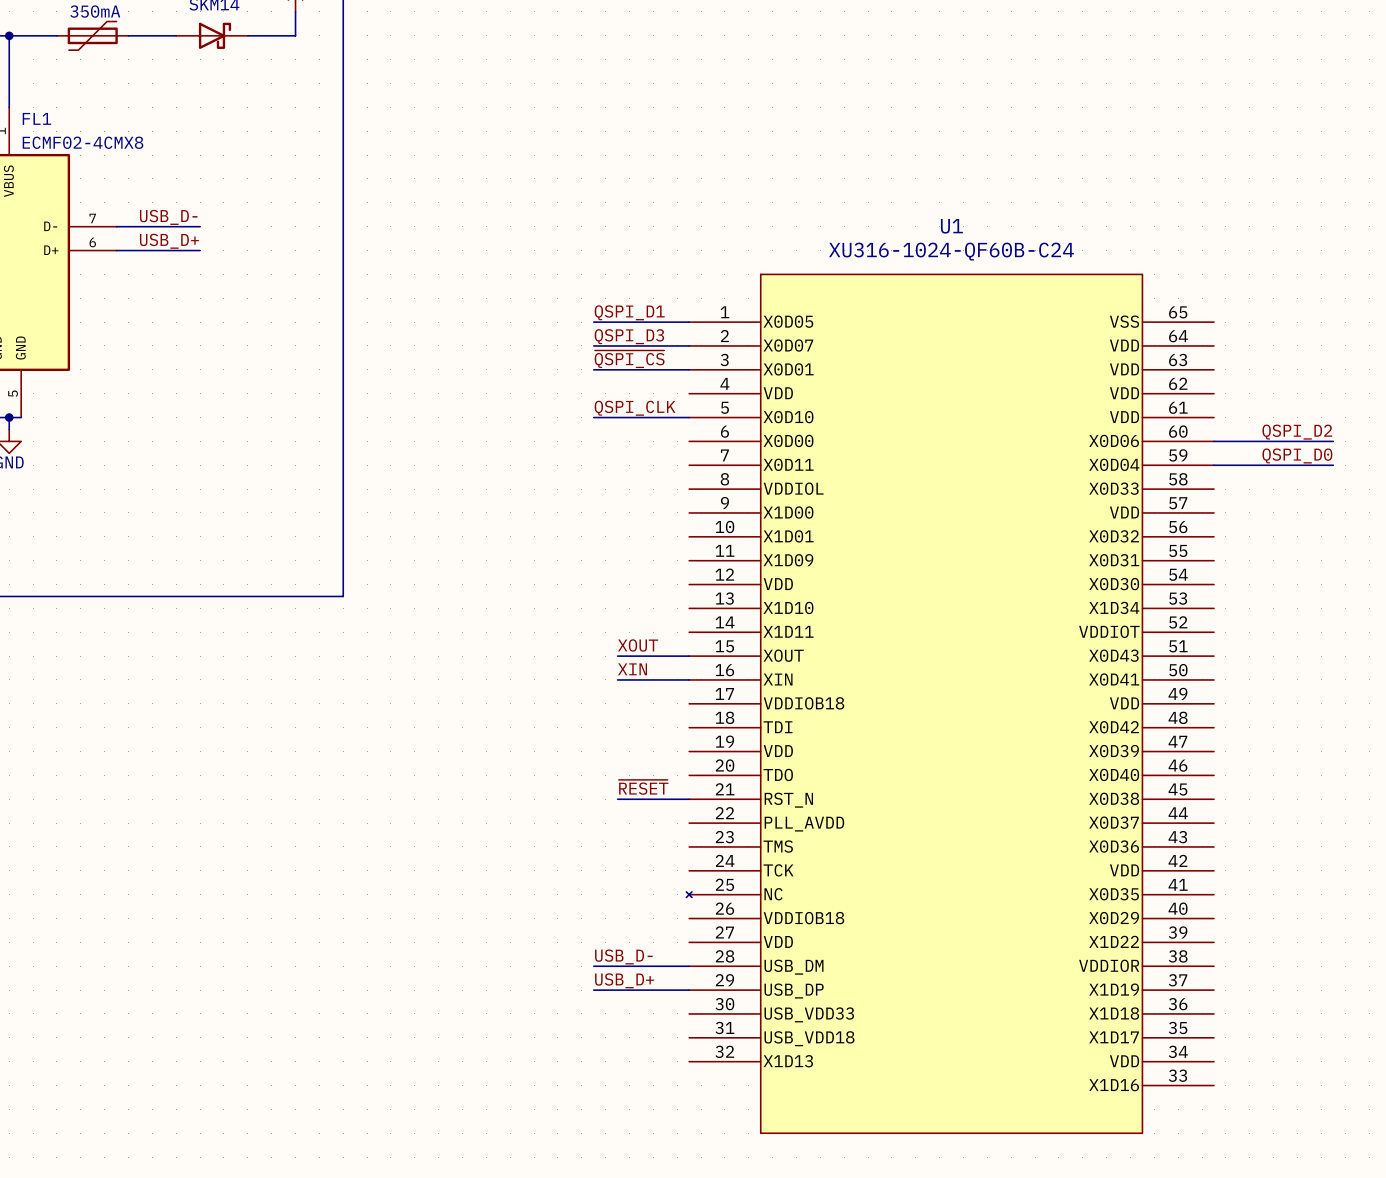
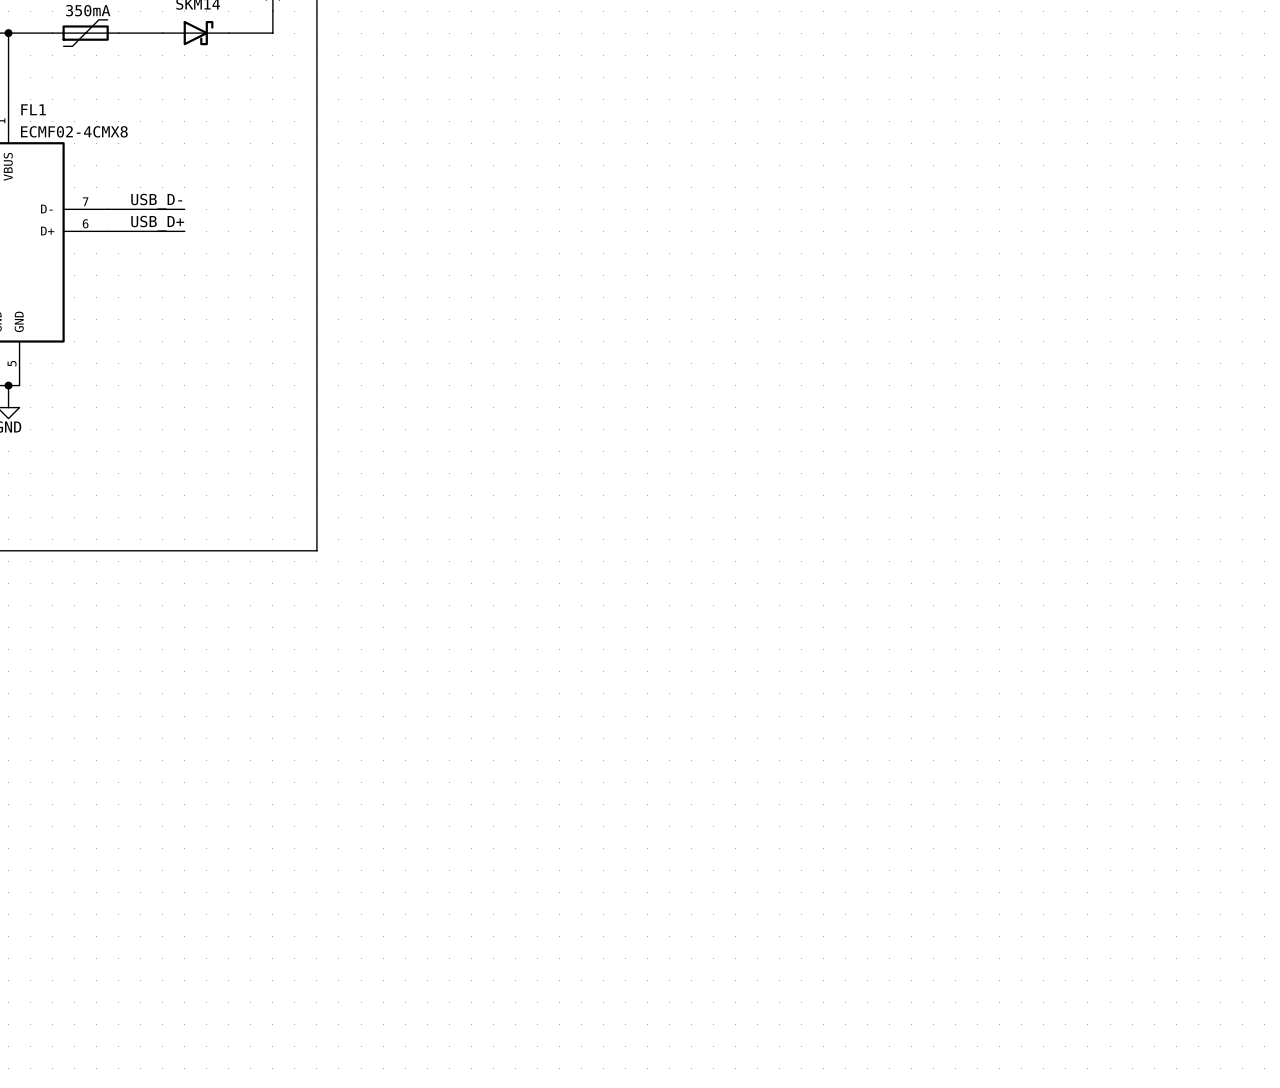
label: QSPI_D1 (629, 312) -> none
wire: (593, 322) (689, 322) -> none
label: QSPI_D3 (629, 336) -> none
wire: (593, 345) (689, 345) -> none
label: ~{QSPI_CS} (629, 359) -> none
wire: (593, 369) (689, 369) -> none
label: QSPI_CLK (635, 408) -> none
wire: (593, 417) (689, 417) -> none
label: QSPI_D2 (1297, 432) -> none
wire: (1214, 441) (1333, 441) -> none
label: QSPI_D0 (1297, 455) -> none
wire: (1214, 465) (1333, 465) -> none
label: XOUT (638, 645) -> none
wire: (617, 656) (689, 656) -> none
label: XIN (632, 669) -> none
wire: (617, 679) (689, 679) -> none
U1: XU316-1024-QF60B-C24 (950, 703) -> none
label: ~{RESET} (643, 787) -> none
wire: (617, 799) (689, 799) -> none
label: USB_D- (623, 956) -> none
wire: (593, 966) (689, 966) -> none
label: USB_D+ (624, 980) -> none
wire: (593, 990) (689, 990) -> none

